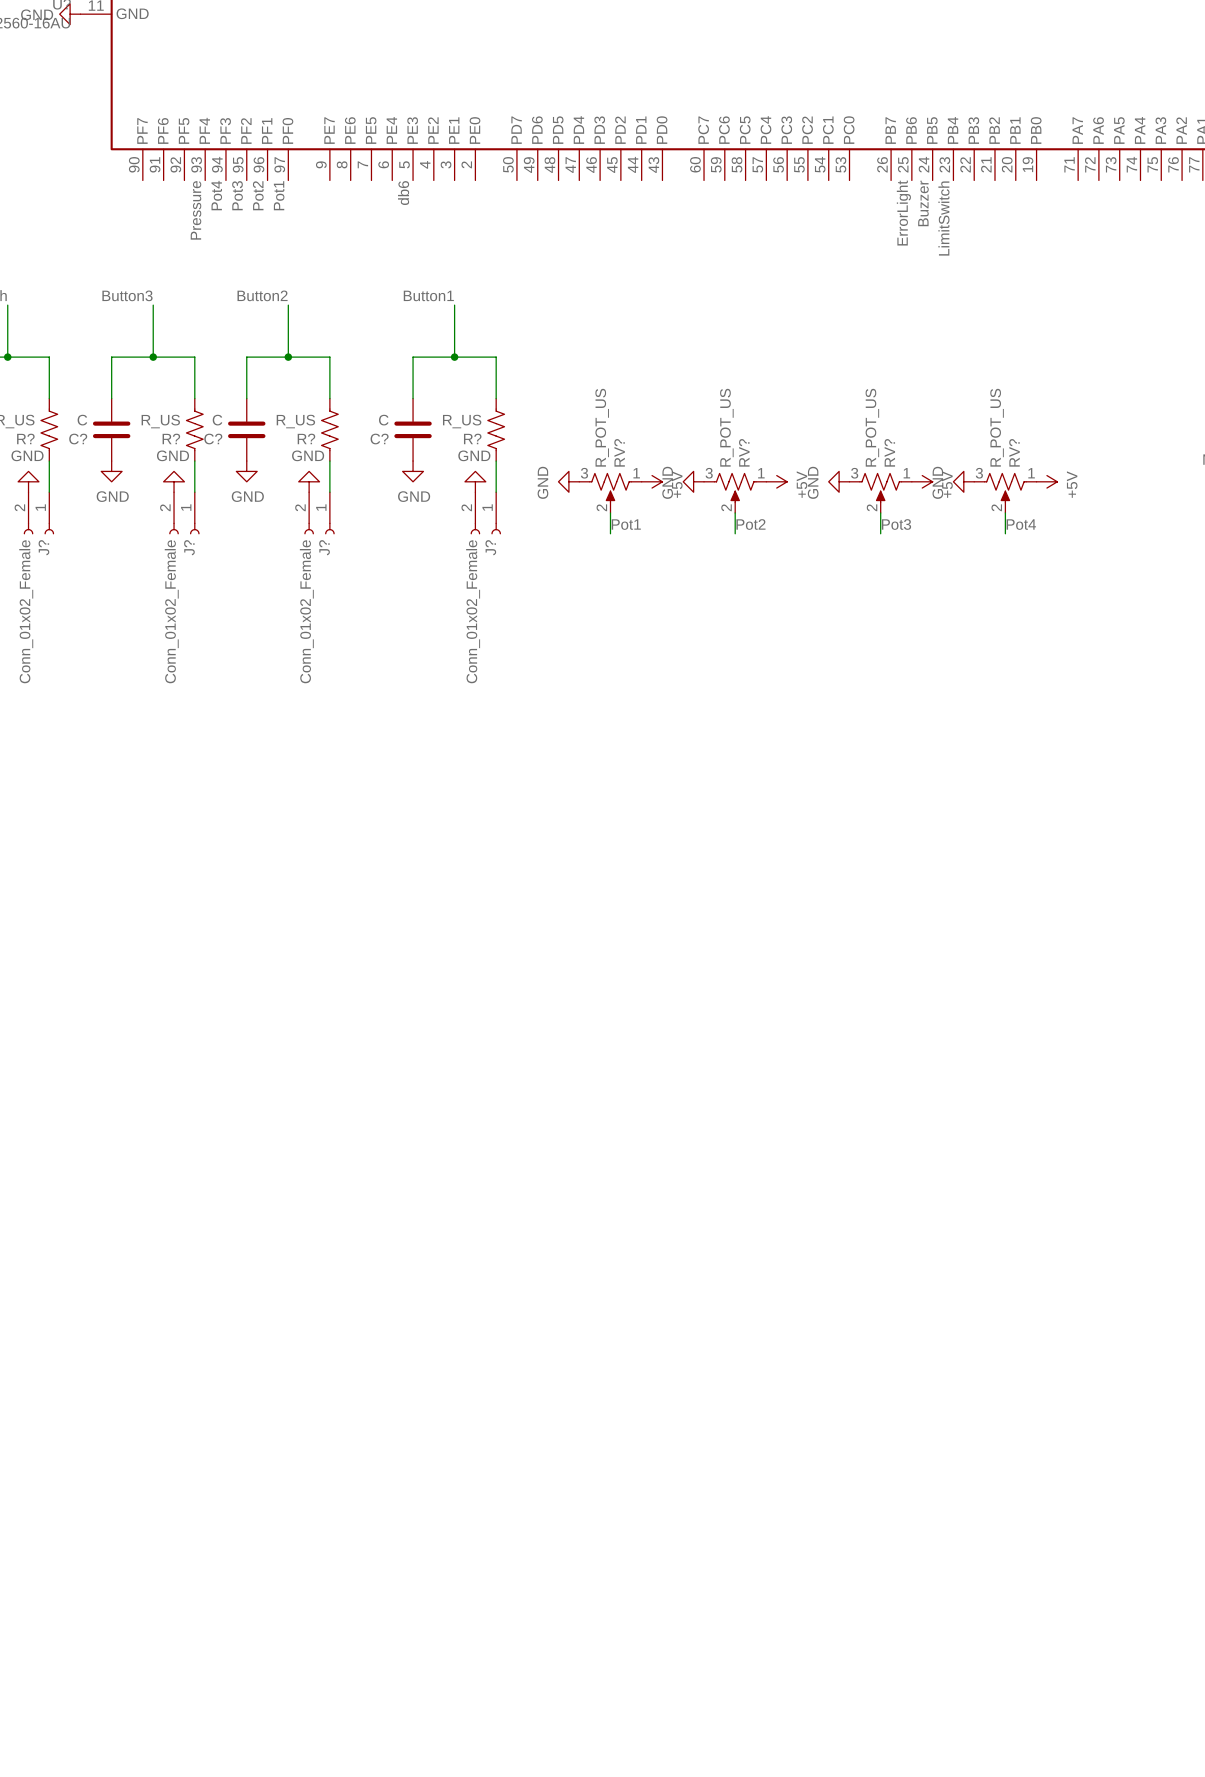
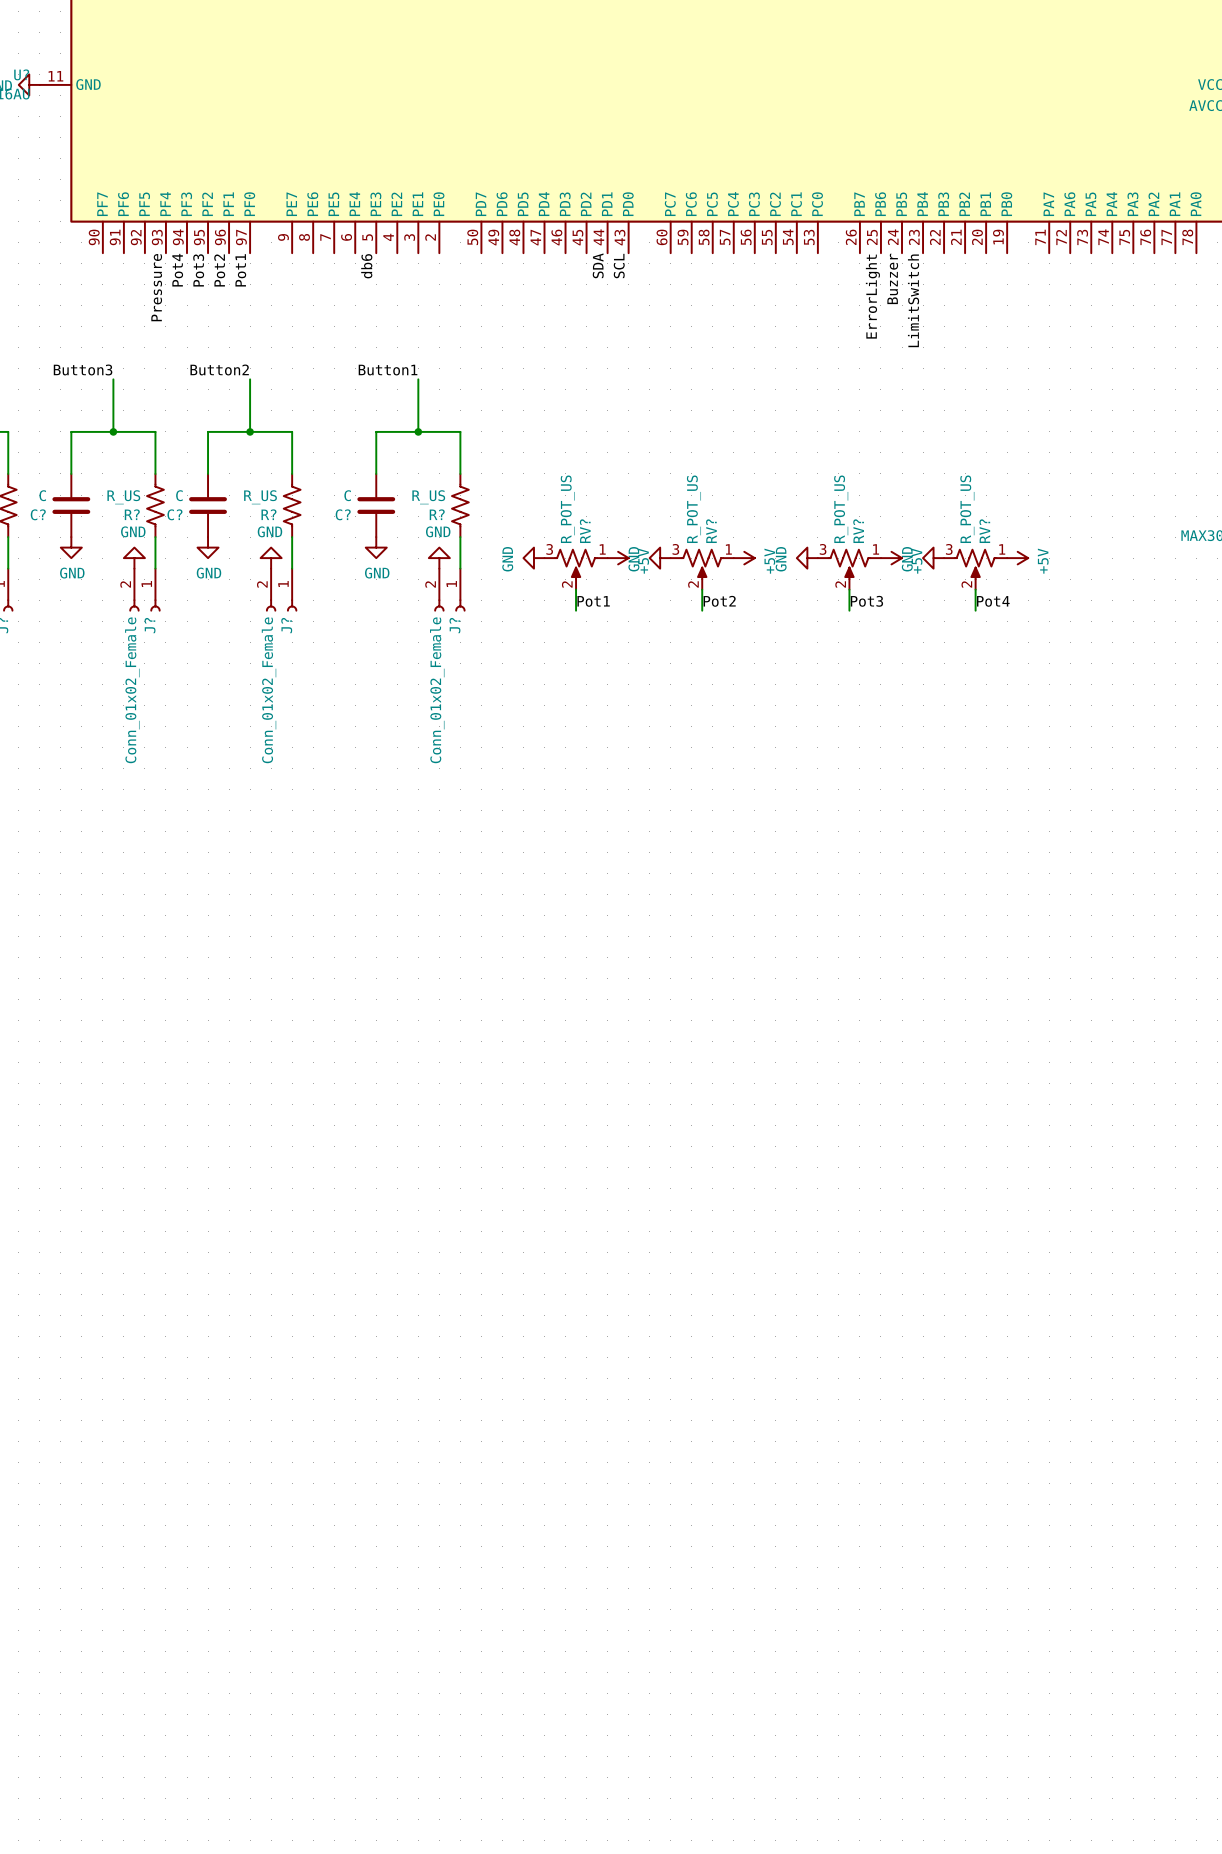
label: none -> SDA (598, 265)
label: none -> SCL (619, 266)

